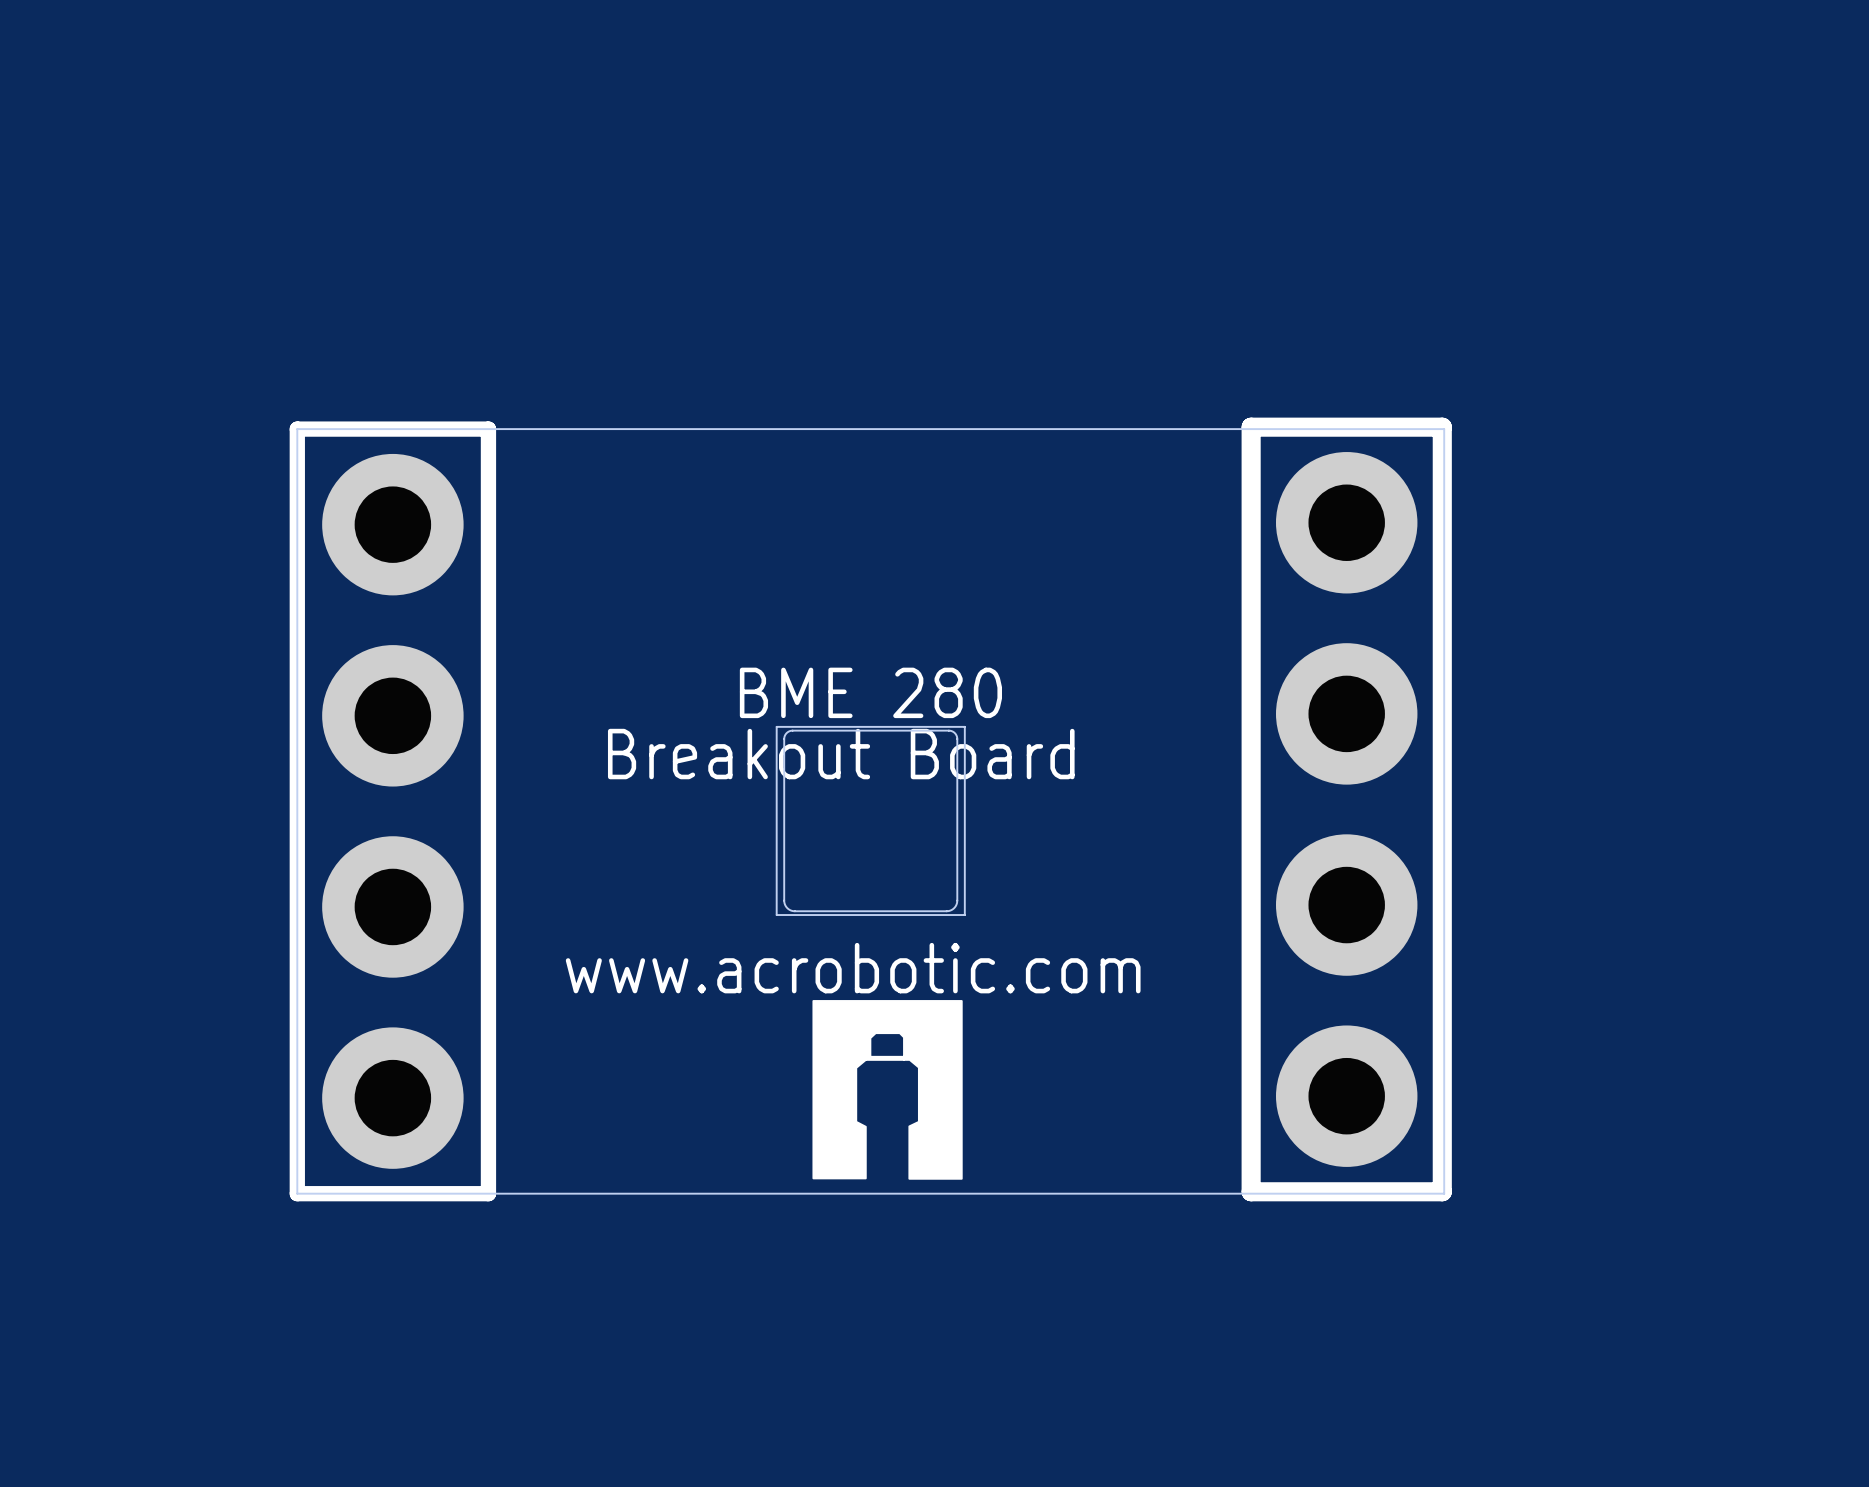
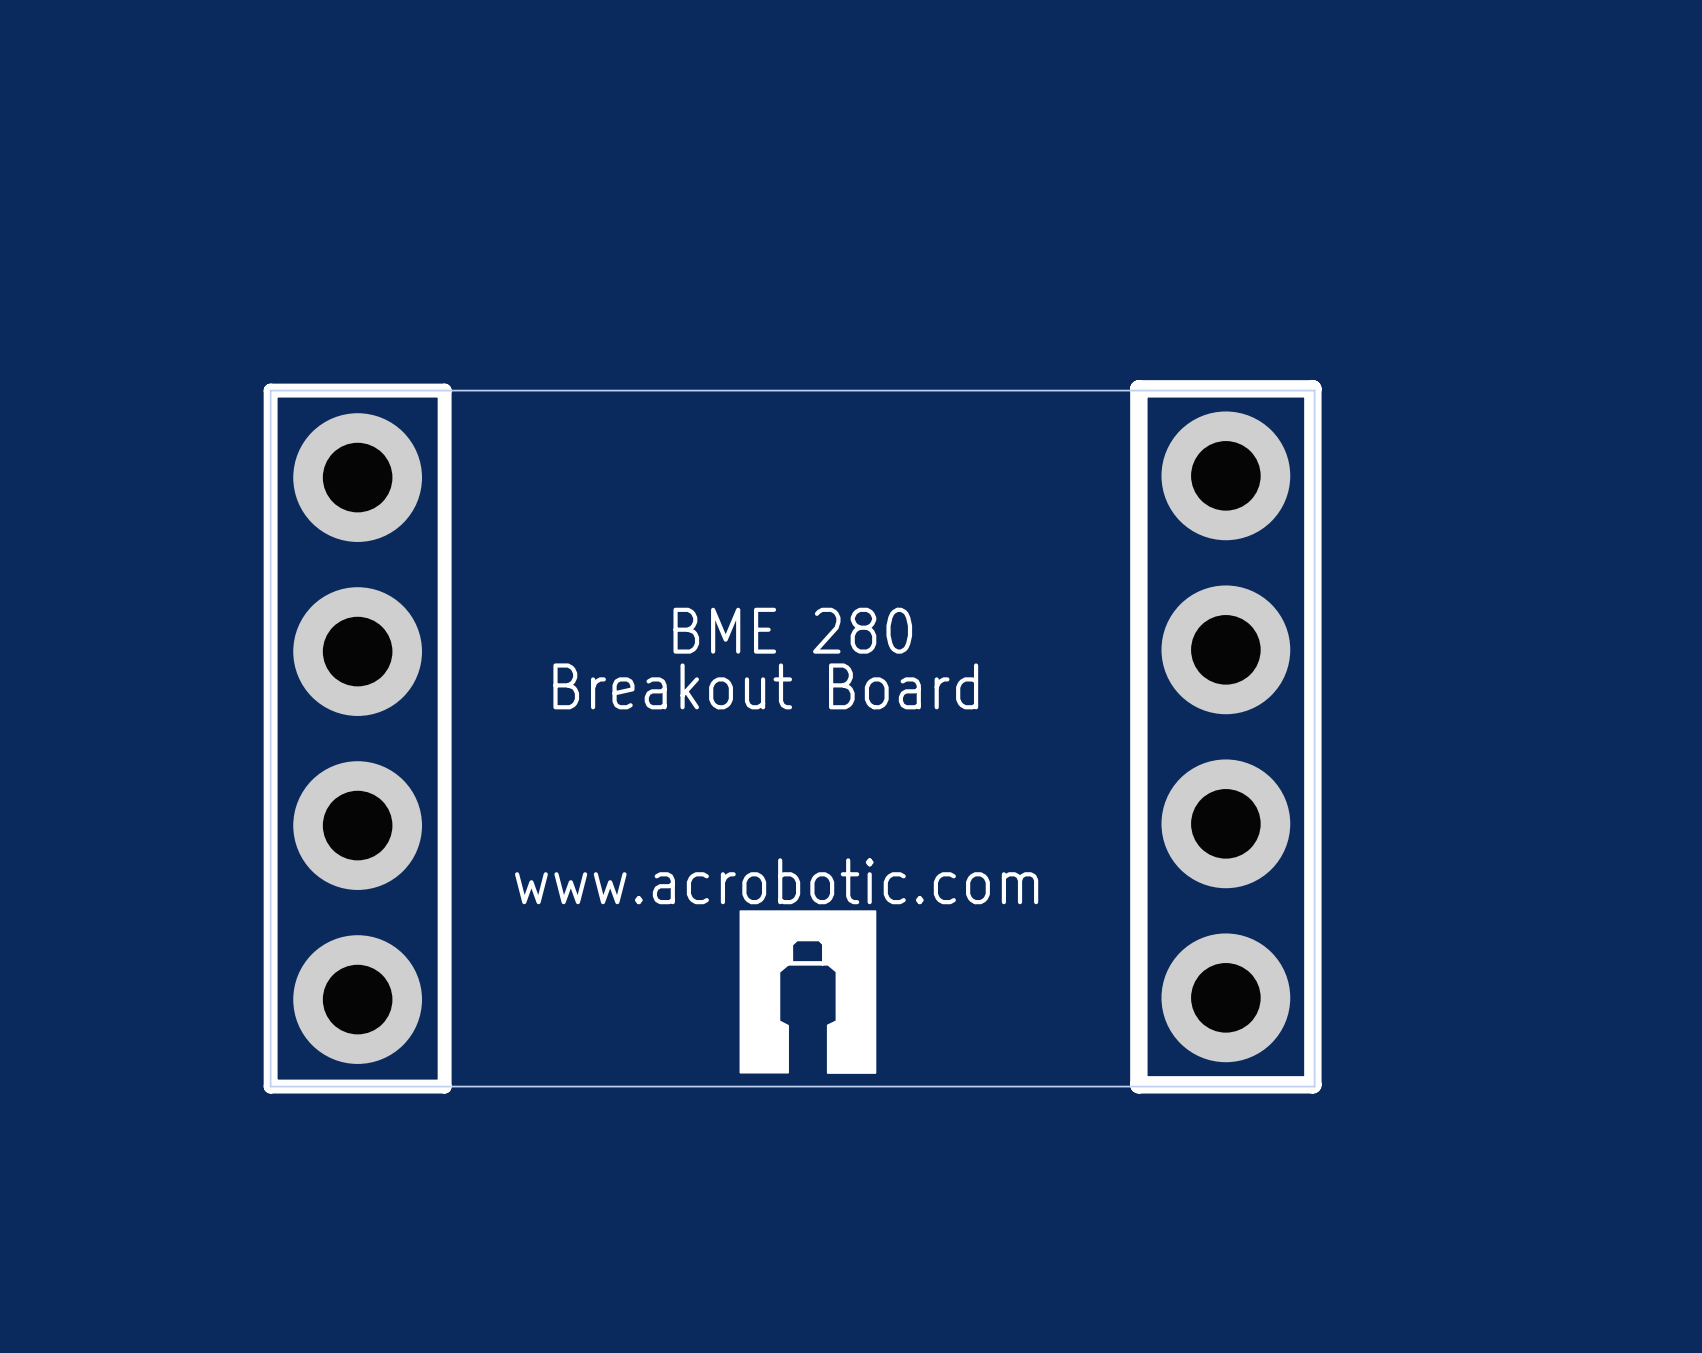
part: (870, 820) -> none

